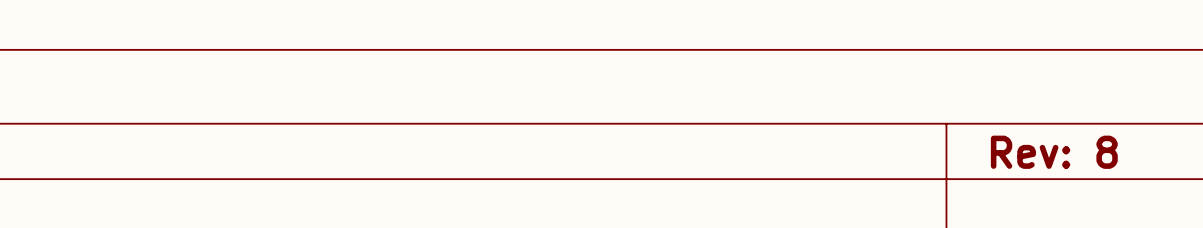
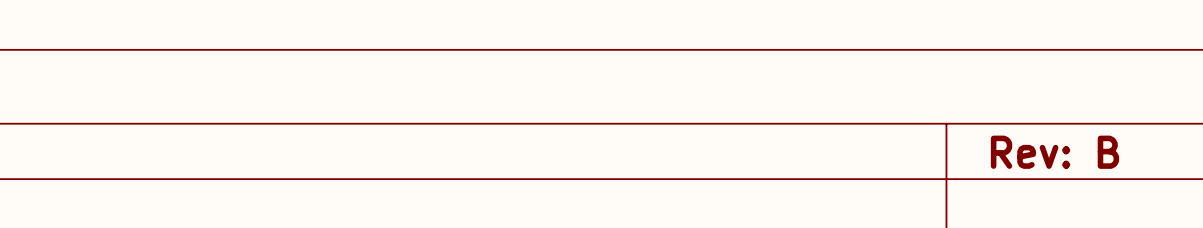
title block: Rev: 8 (1054, 152) -> Rev: B (1054, 152)

